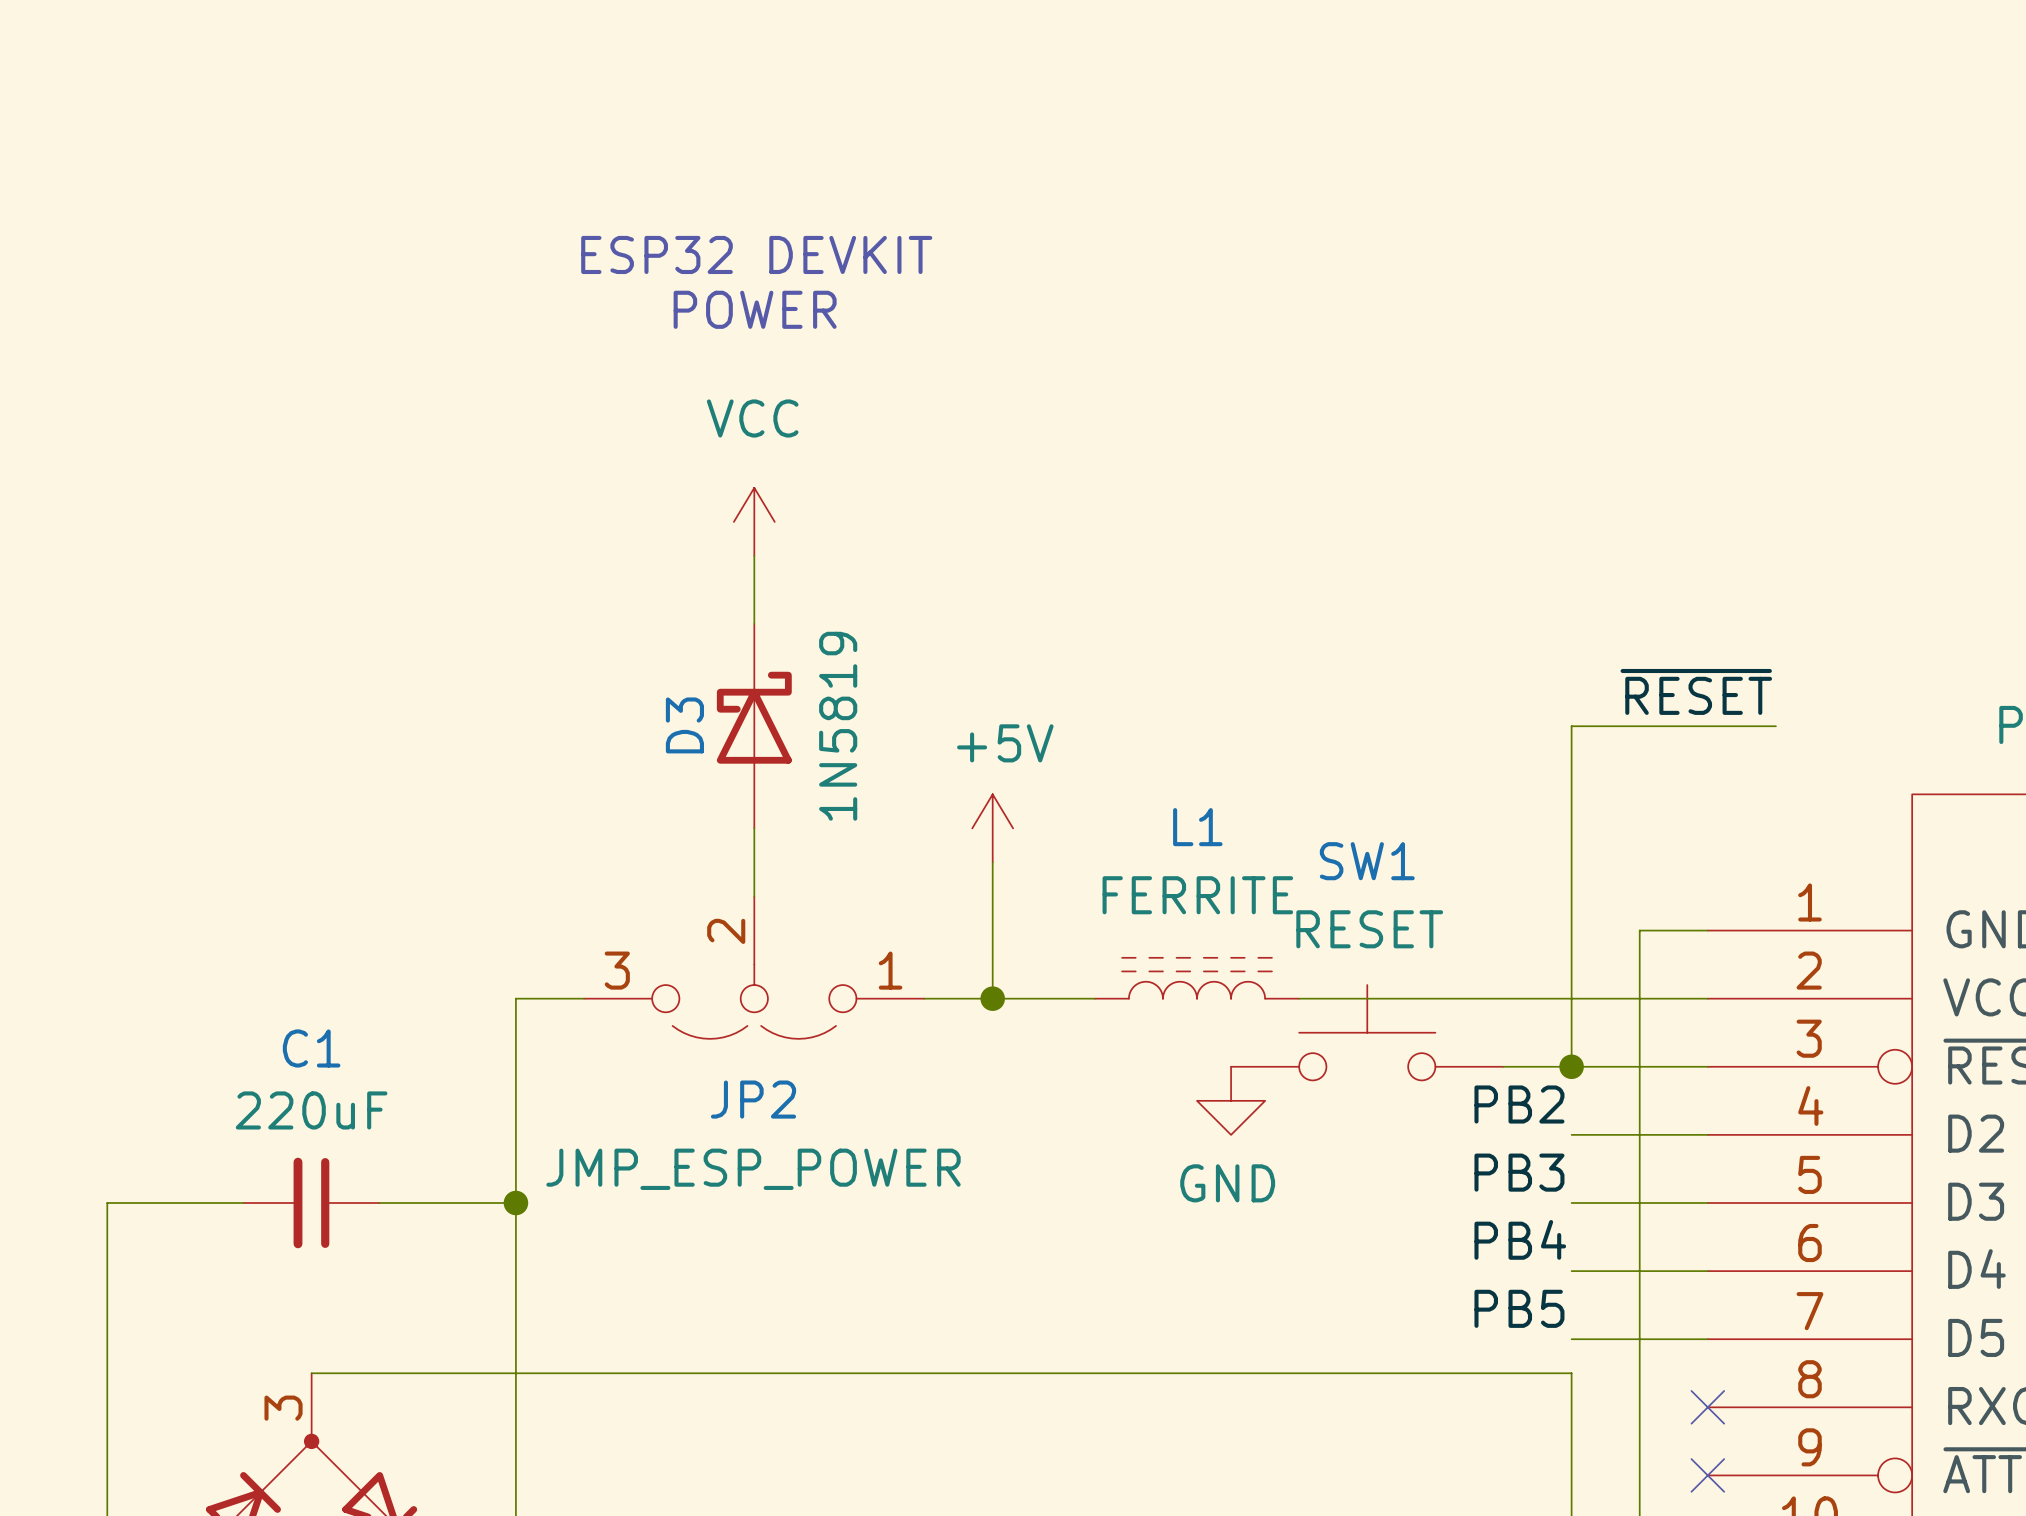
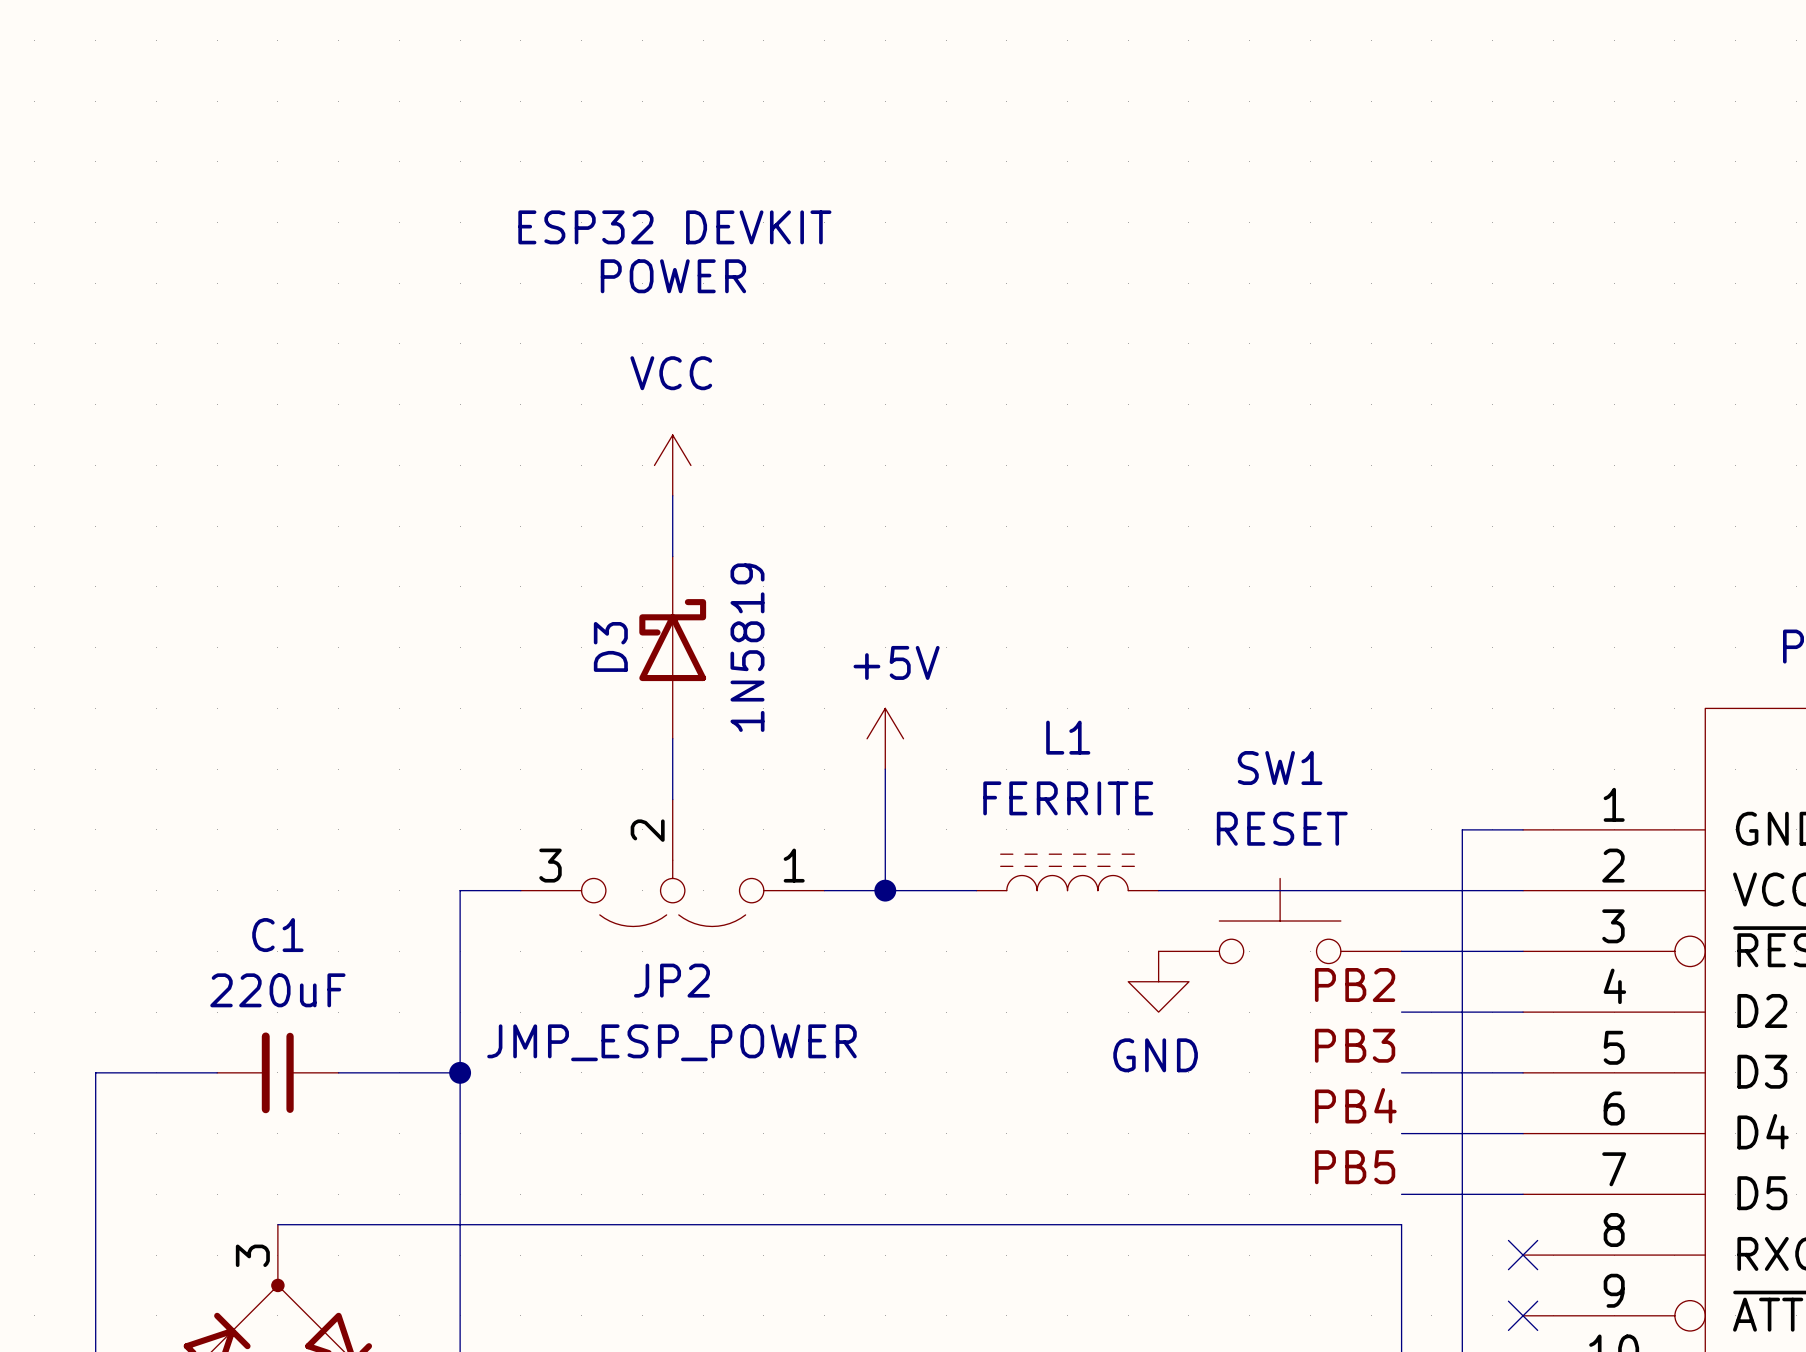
label: ~{RESET} (1696, 691) -> none
wire: (1775, 726) (1571, 726) (1571, 1066) (1503, 1066) -> none
SW1 position: (1367, 1032) -> (1280, 921)
junction: (1571, 1066) -> none
power symbol position: GND (1231, 1100) -> GND (1158, 981)

